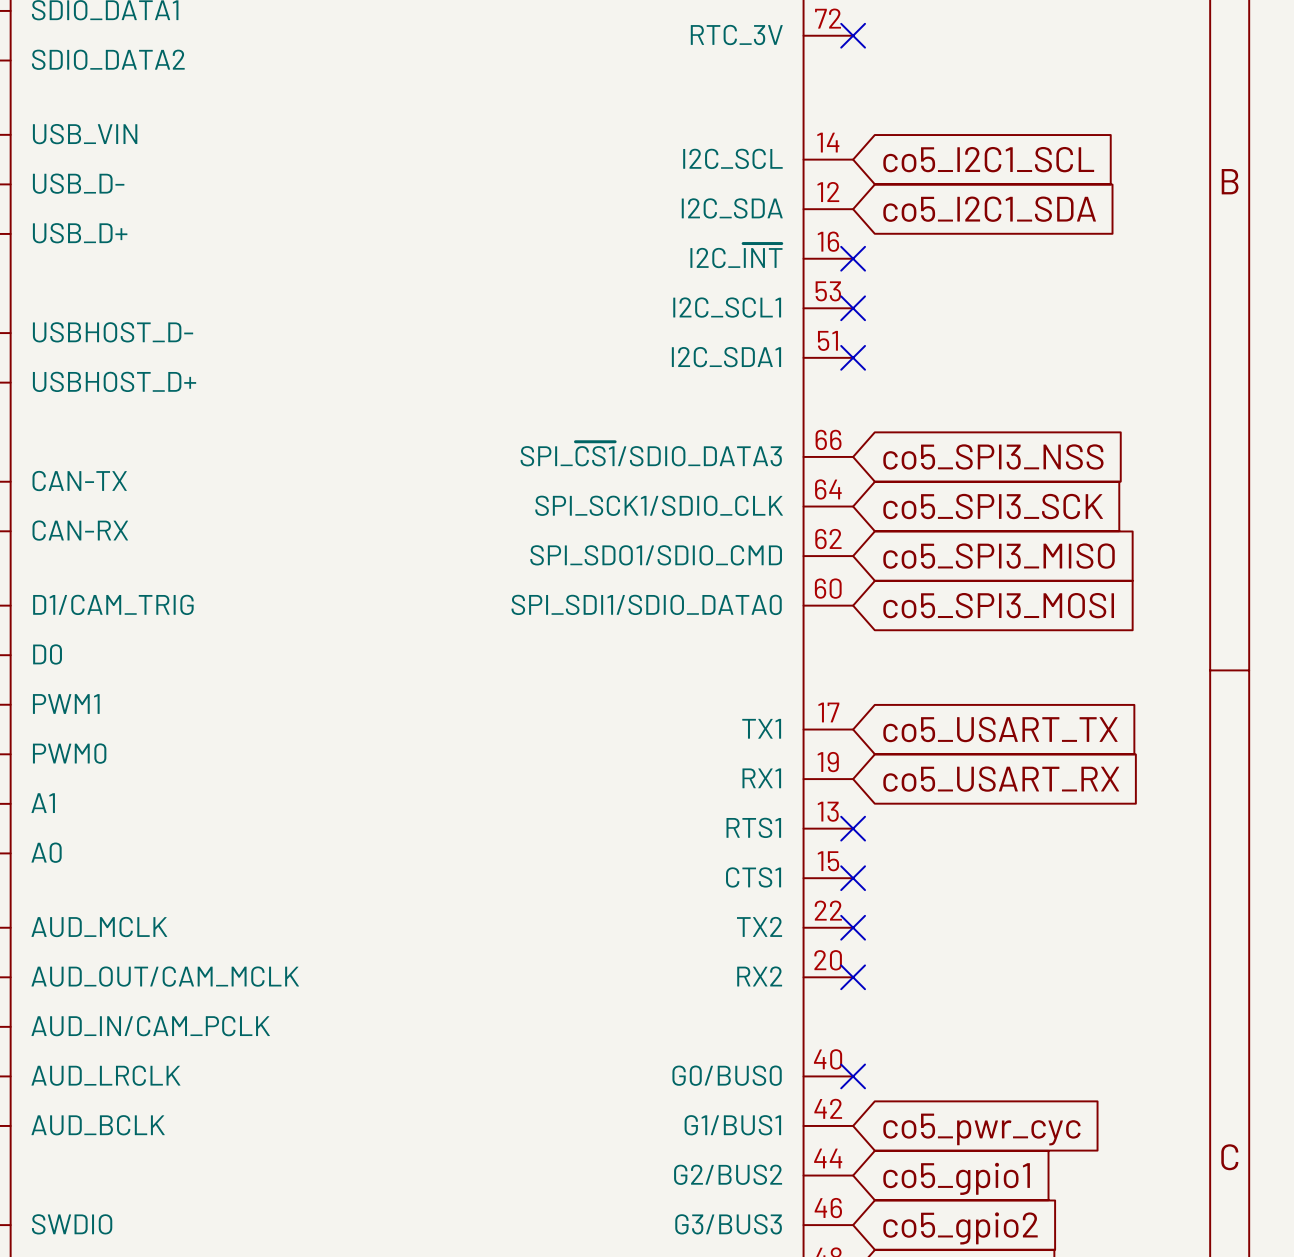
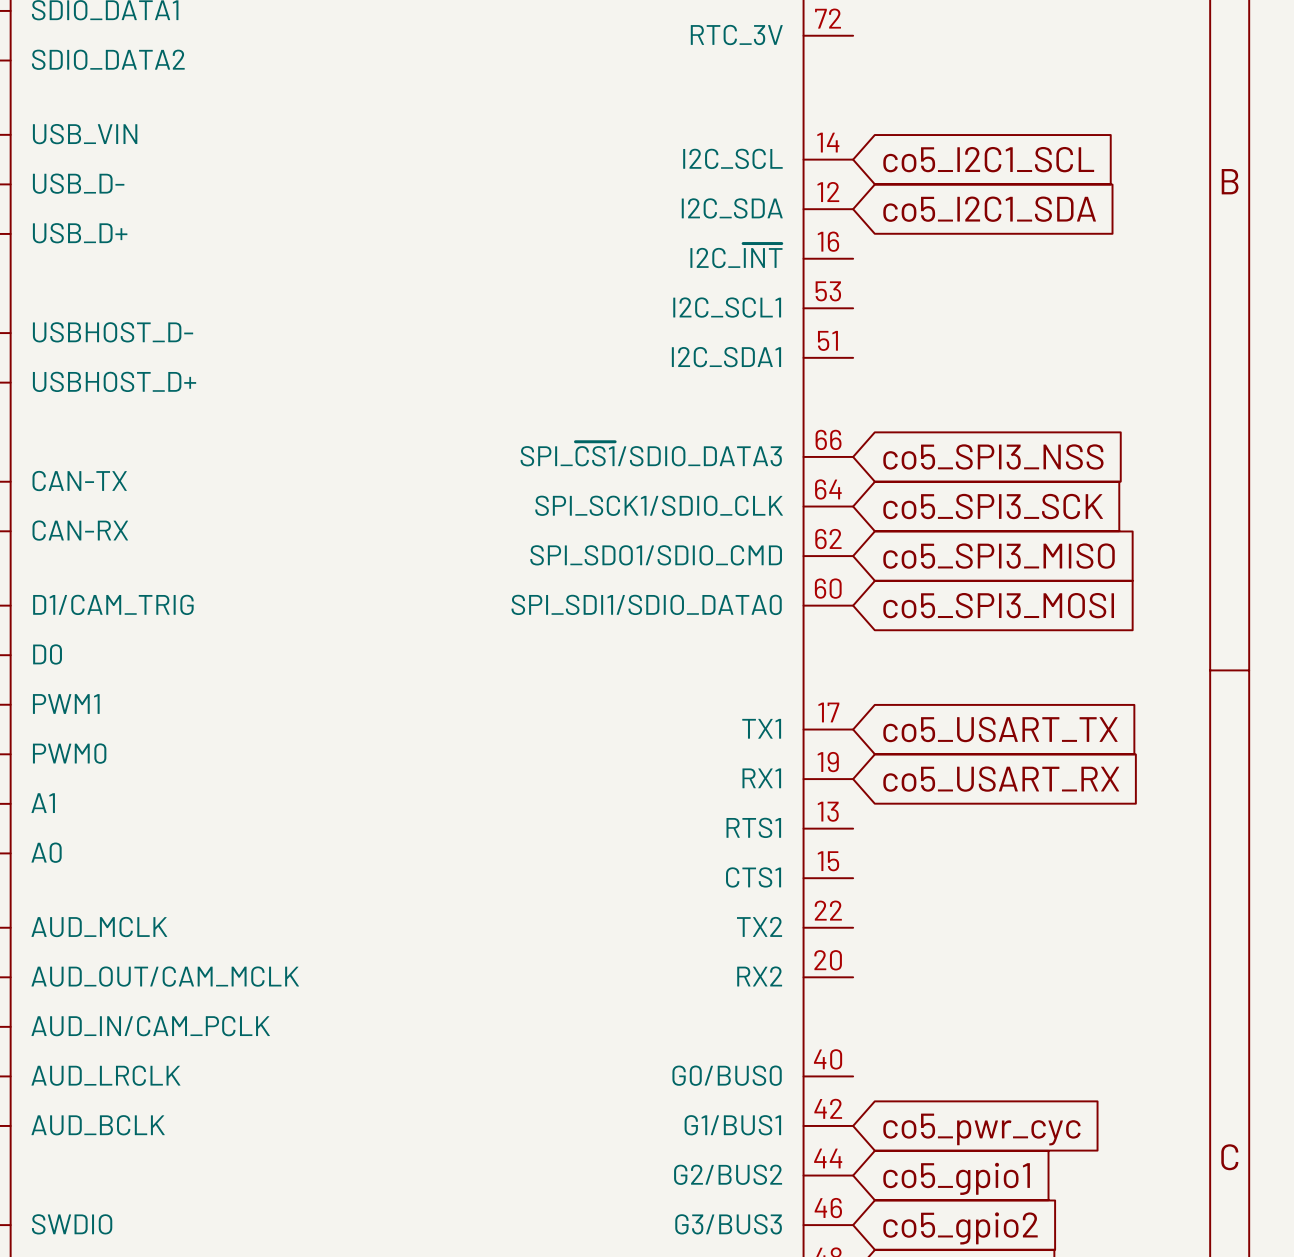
no-connect mark: (853, 35) -> none
no-connect mark: (853, 258) -> none
no-connect mark: (853, 308) -> none
no-connect mark: (853, 357) -> none
no-connect mark: (853, 828) -> none
no-connect mark: (853, 878) -> none
no-connect mark: (853, 927) -> none
no-connect mark: (853, 977) -> none
no-connect mark: (853, 1076) -> none

